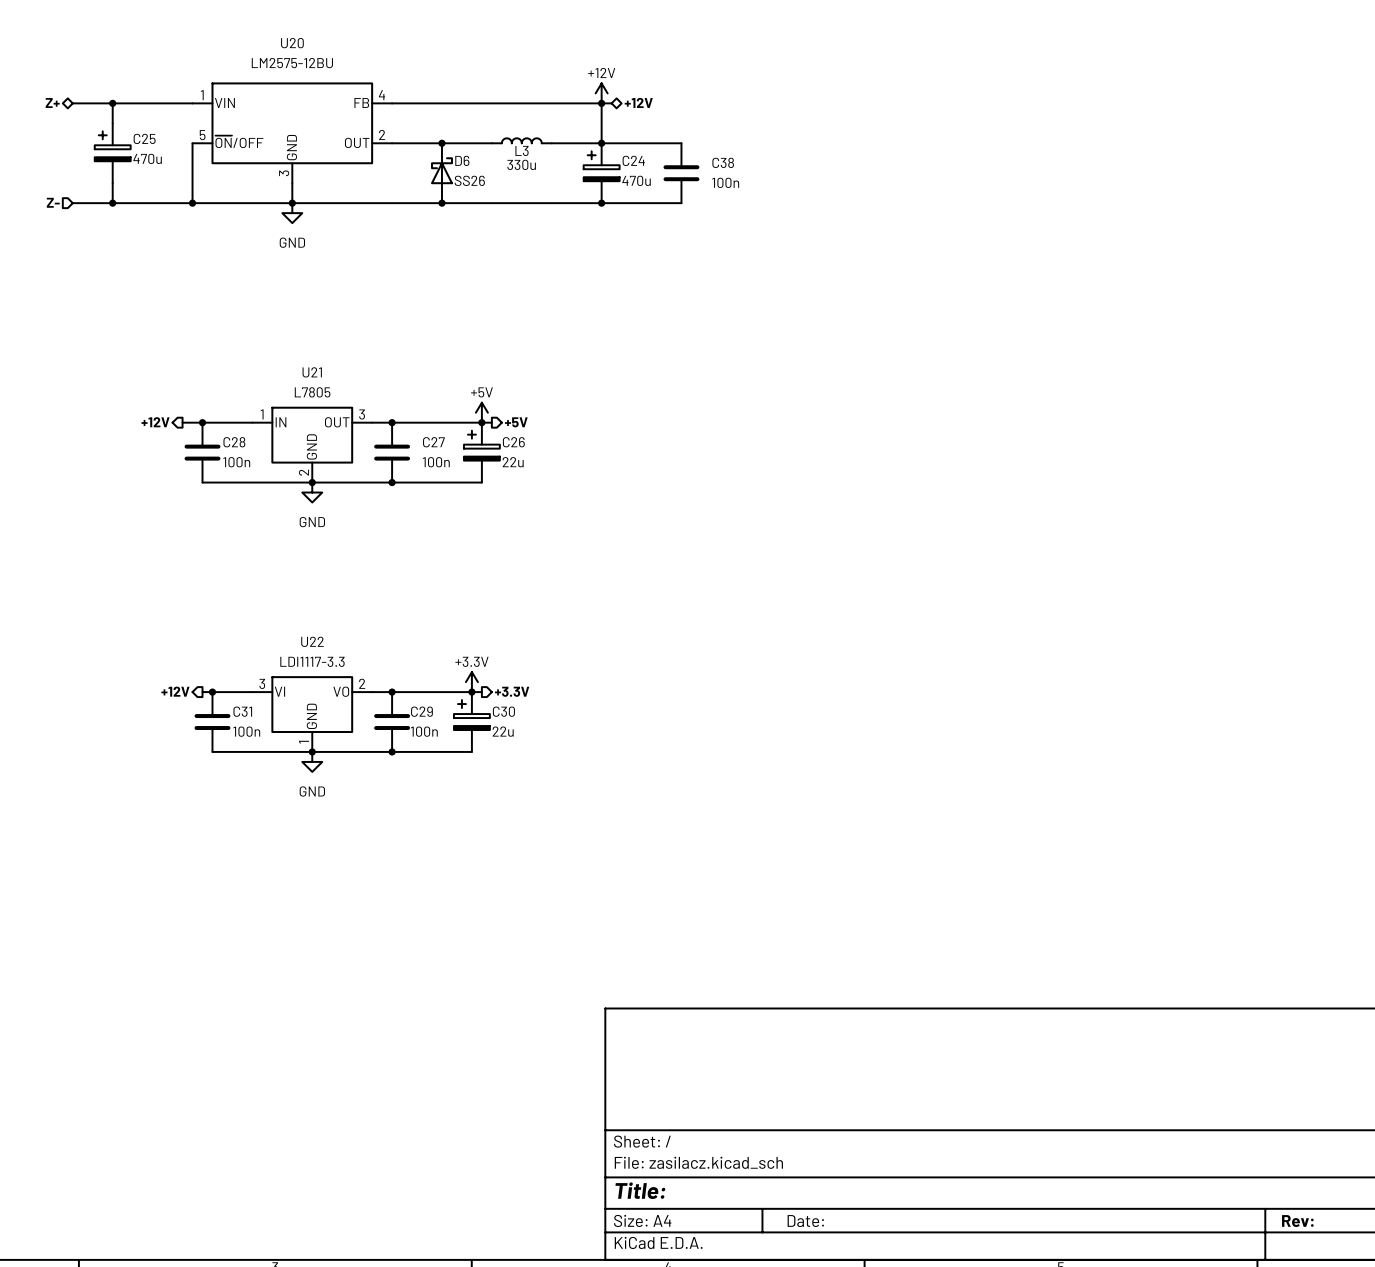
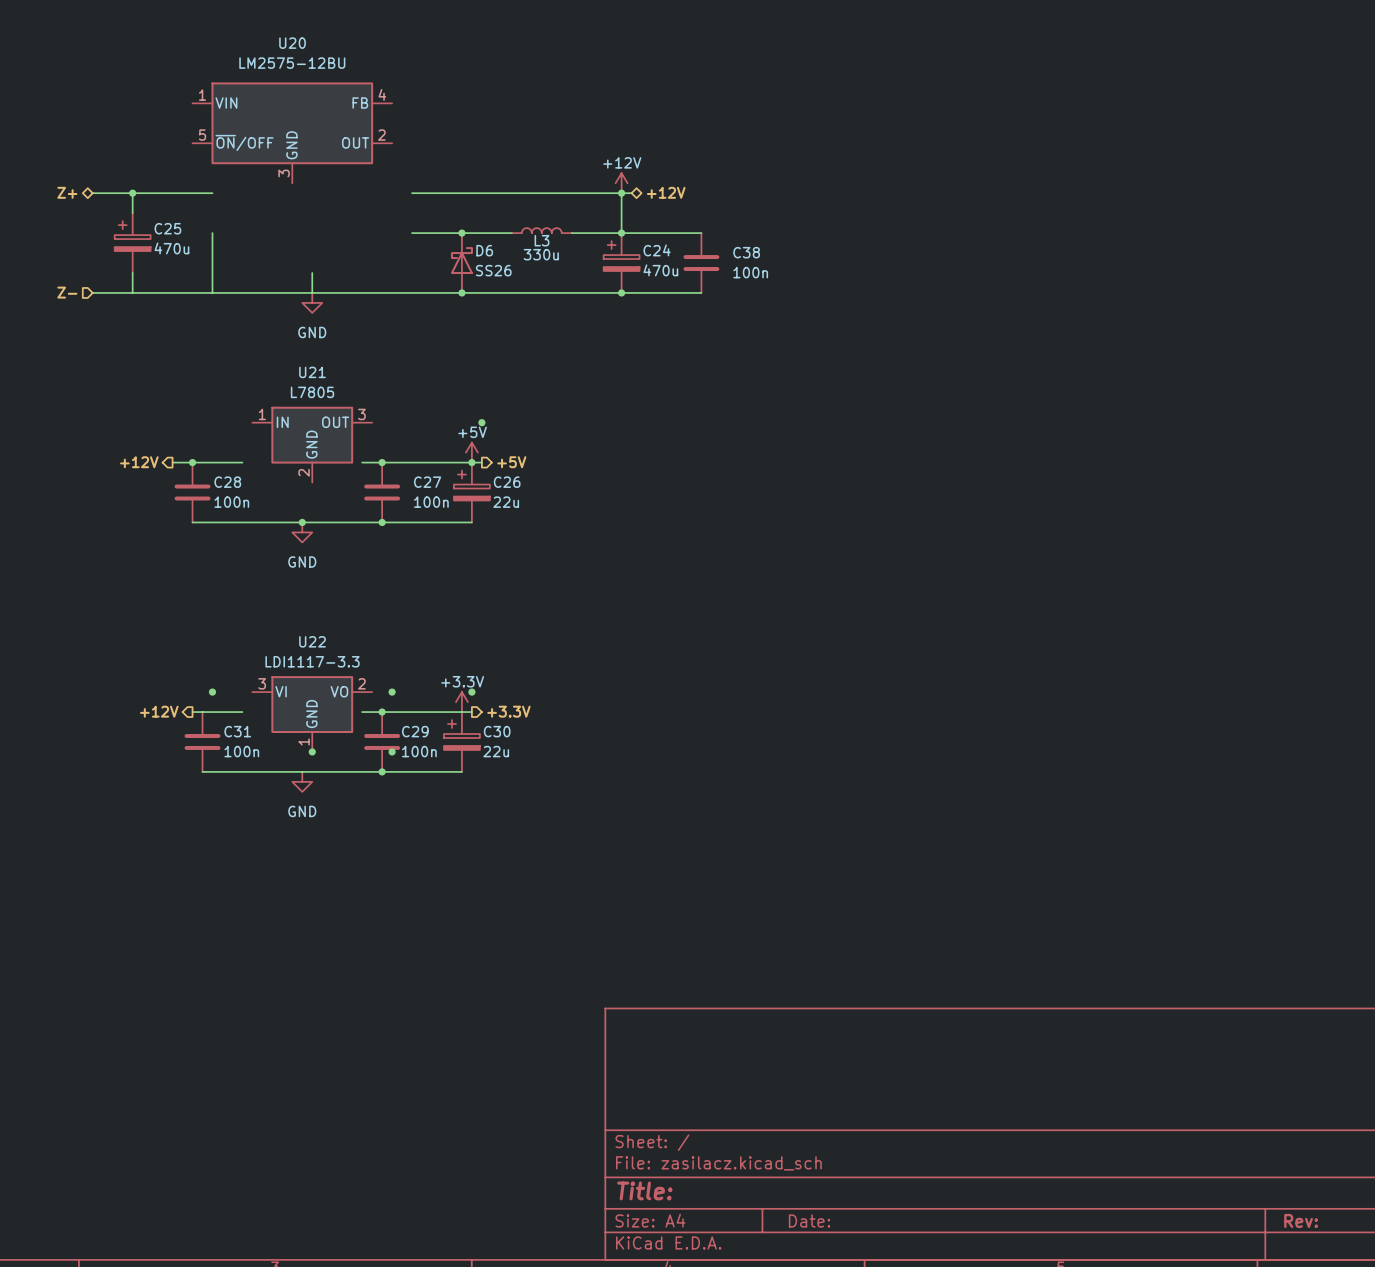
power symbol position: +12V (601, 93) -> +12V (621, 183)
hierarchical label position: +12V (638, 102) -> +12V (666, 192)
hierarchical label position: Z+ (52, 103) -> Z+ (67, 192)
wire: (72, 103) (192, 103) -> (92, 193) (212, 193)
wire: (112, 103) (112, 123) -> (132, 193) (132, 213)
junction: (112, 103) -> none
wire: (392, 103) (611, 103) -> (412, 193) (631, 193)
wire: (601, 103) (601, 143) -> (621, 193) (621, 233)
junction: (601, 103) -> none
L3 position: (521, 140) -> (541, 230)
wire: (192, 143) (192, 203) -> (212, 233) (212, 292)
wire: (392, 143) (491, 143) -> (412, 233) (511, 233)
junction: (441, 143) -> none
wire: (551, 143) (681, 143) -> (571, 233) (701, 233)
junction: (601, 143) -> none
C25 position: (112, 153) -> (132, 243)
D6 position: (441, 173) -> (461, 263)
C24 position: (601, 173) -> (621, 263)
C38 position: (681, 173) -> (701, 263)
wire: (112, 183) (112, 203) -> (132, 273) (132, 292)
wire: (292, 183) (292, 203) -> (312, 273) (312, 292)
junction: none -> (621, 193)
hierarchical label position: Z- (53, 202) -> Z- (67, 292)
wire: (72, 203) (681, 203) -> (92, 292) (701, 292)
junction position: (112, 203) -> (132, 193)
junction: (192, 203) -> none
junction: (292, 203) -> none
junction position: (441, 203) -> (461, 233)
junction: (601, 203) -> none
power symbol position: GND (292, 213) -> GND (312, 302)
junction: none -> (621, 233)
junction: none -> (461, 292)
junction: none -> (621, 292)
power symbol position: +5V (481, 412) -> +5V (471, 452)
hierarchical label position: +12V (155, 422) -> +12V (139, 462)
wire: (182, 422) (252, 422) -> (172, 462) (242, 462)
junction position: (202, 422) -> (192, 462)
wire: (372, 422) (491, 422) -> (362, 462) (481, 462)
junction: (392, 422) -> none
hierarchical label position: +5V (516, 422) -> +5V (511, 462)
C28 position: (202, 452) -> (192, 492)
C27 position: (392, 452) -> (382, 492)
C26 position: (481, 452) -> (471, 492)
junction: none -> (382, 462)
junction: none -> (471, 462)
wire: (202, 482) (481, 482) -> (192, 522) (471, 522)
junction: (312, 482) -> none
junction: (392, 482) -> none
power symbol position: GND (312, 492) -> GND (302, 532)
junction: none -> (302, 522)
junction: none -> (382, 522)
power symbol position: +3.3V (471, 682) -> +3.3V (461, 702)
hierarchical label position: +12V (175, 691) -> +12V (159, 711)
hierarchical label position: +3.3V (512, 691) -> +3.3V (508, 711)
wire: (202, 692) (252, 692) -> (192, 712) (242, 712)
wire: (372, 692) (481, 692) -> (362, 712) (471, 712)
junction: none -> (382, 712)
C31 position: (212, 722) -> (202, 741)
C29 position: (392, 722) -> (382, 741)
C30 position: (471, 722) -> (461, 741)
wire: (212, 751) (471, 751) -> (202, 771) (461, 771)
power symbol position: GND (312, 761) -> GND (302, 781)
junction: none -> (382, 771)

